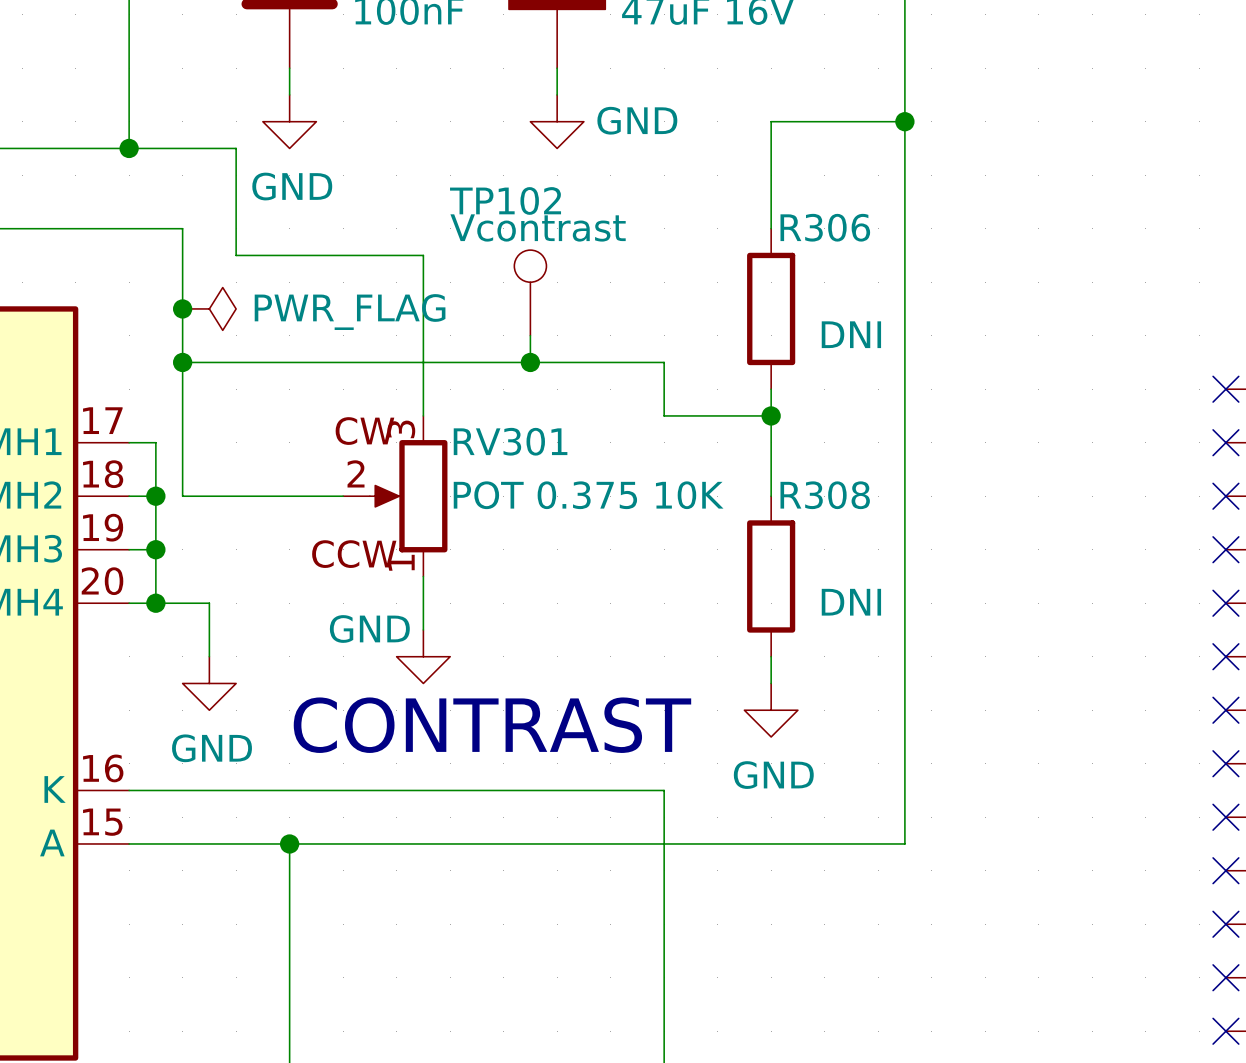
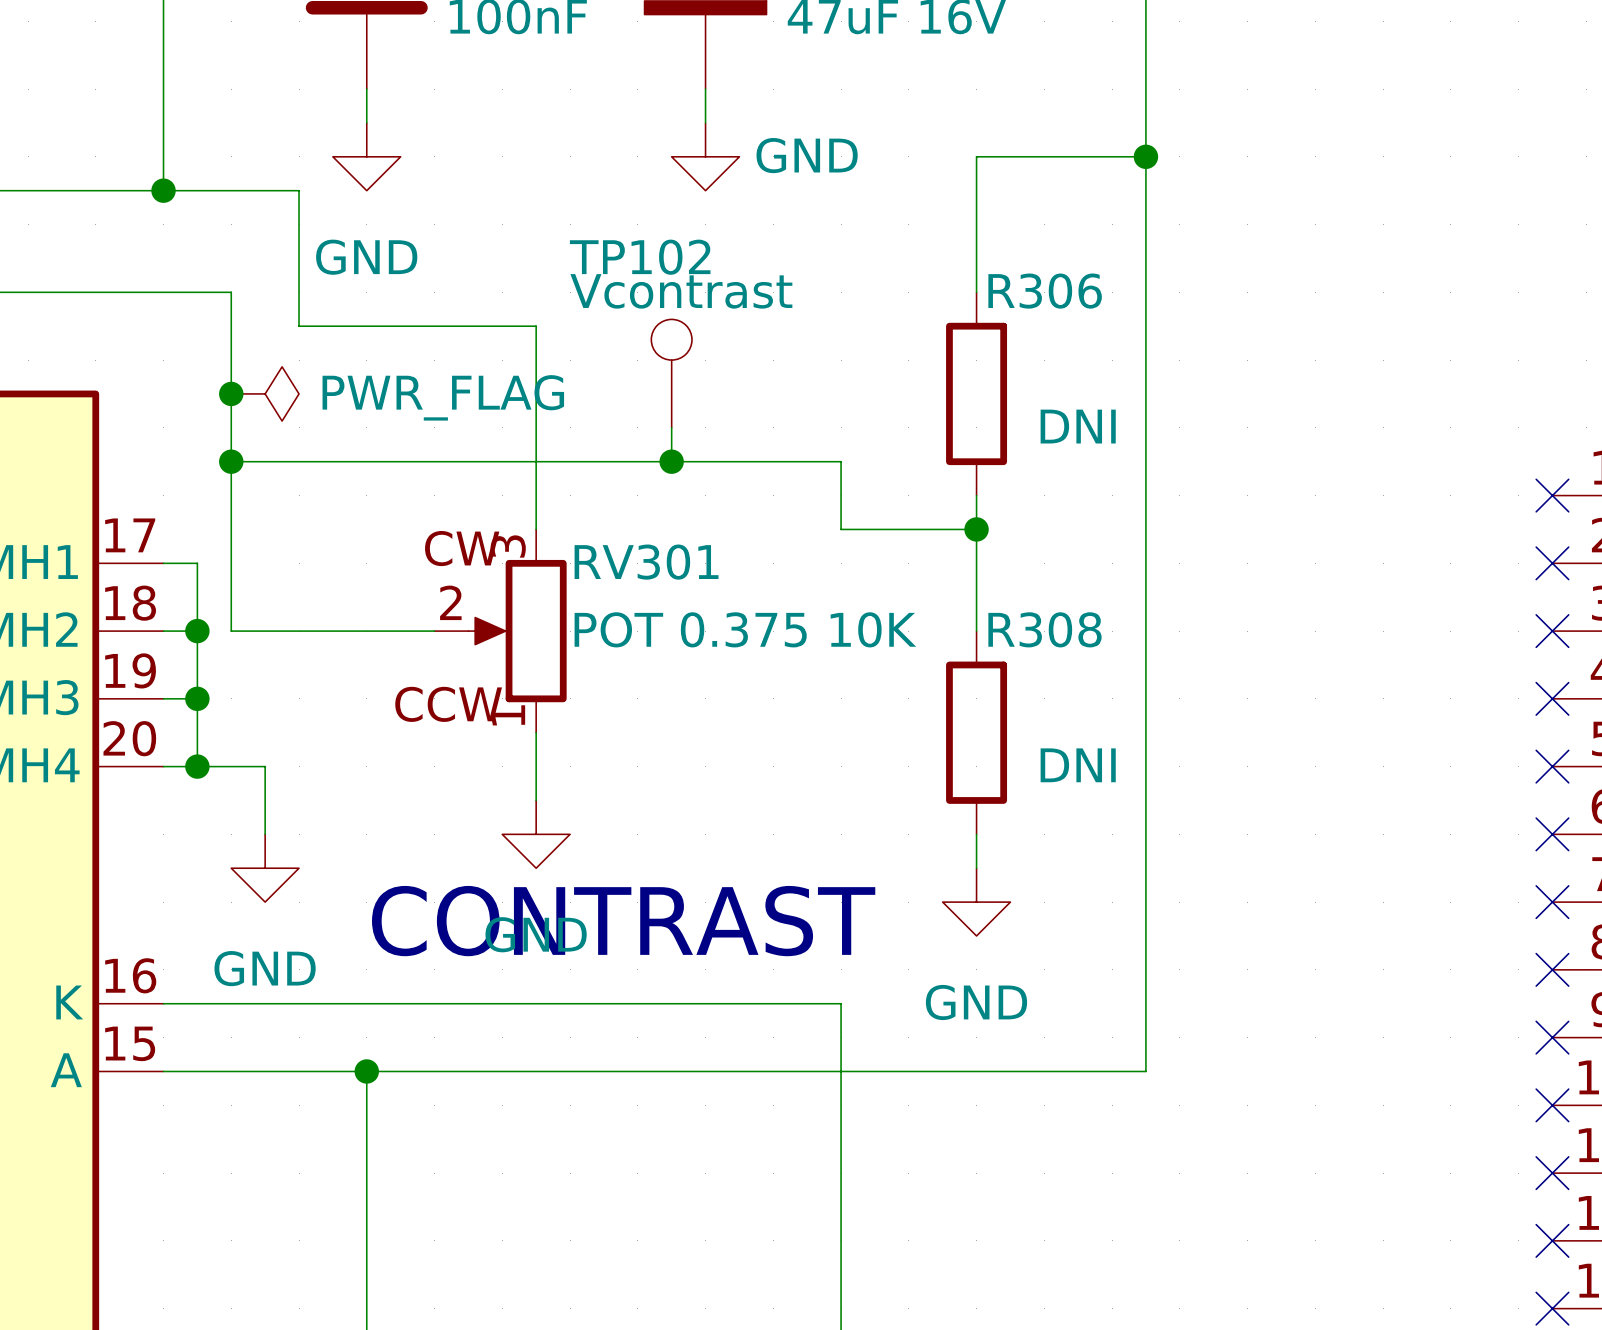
power symbol text position: GND (292, 186) -> GND (366, 257)
power symbol text position: GND (369, 628) -> GND (536, 934)
power symbol text position: GND (212, 748) -> GND (265, 968)
power symbol text position: GND (773, 775) -> GND (976, 1002)

